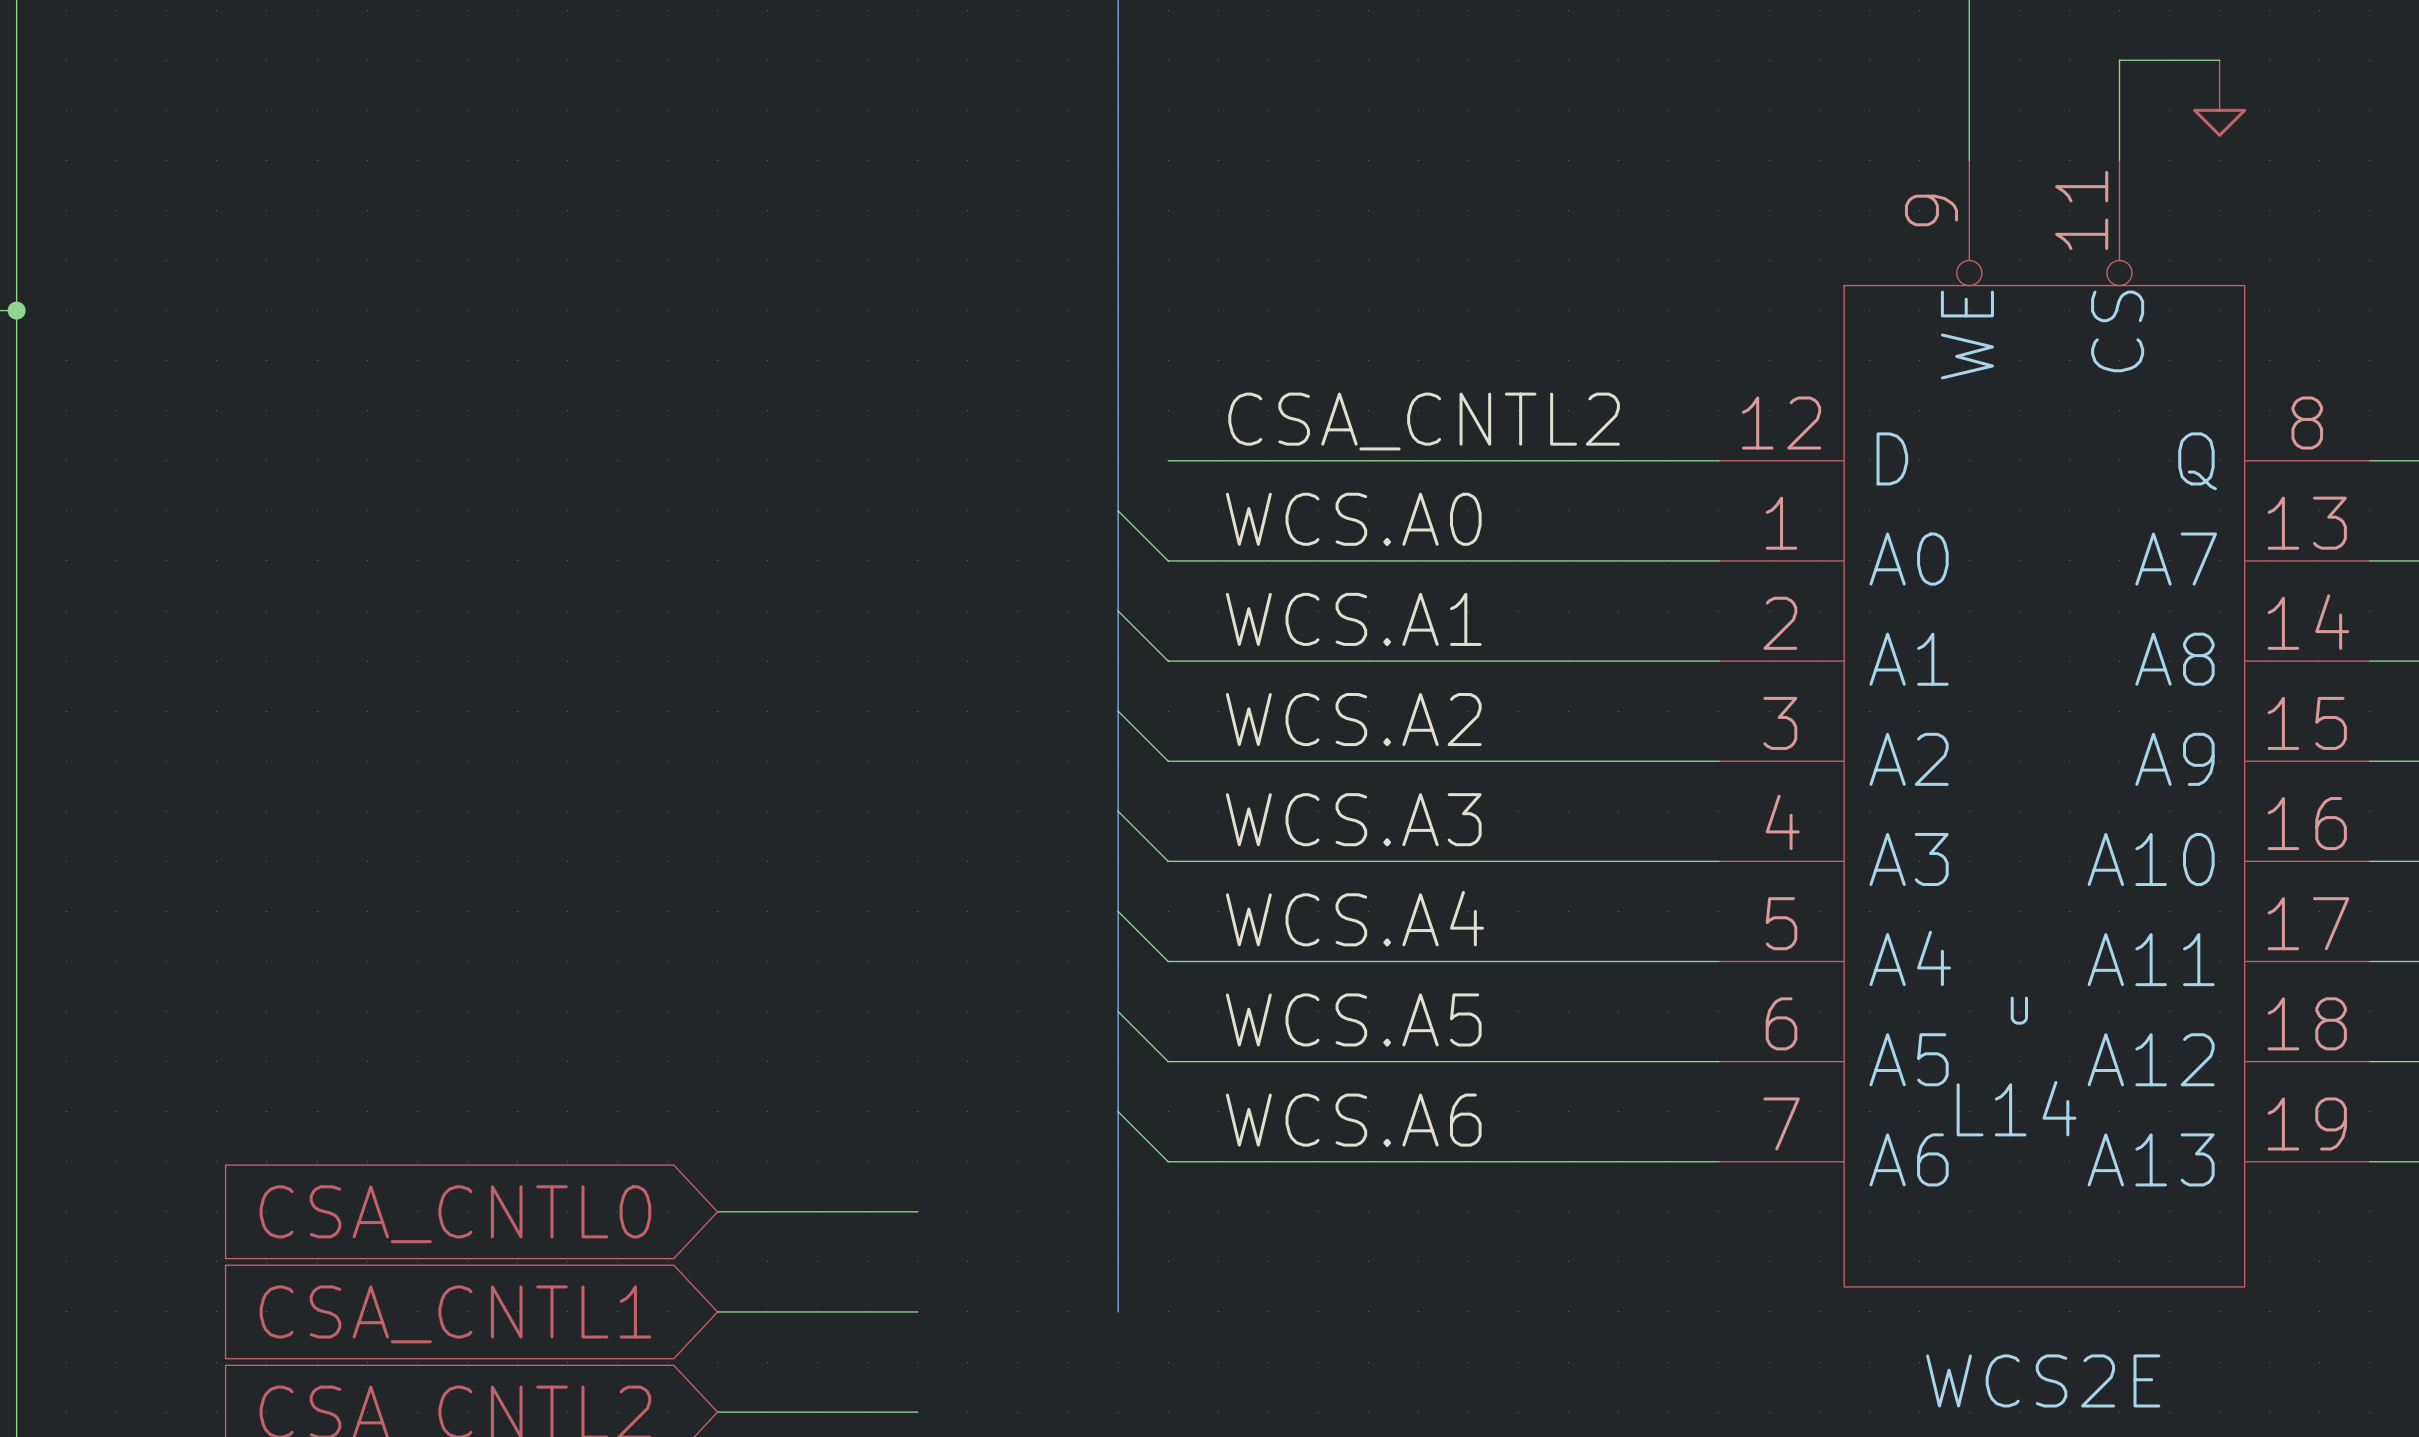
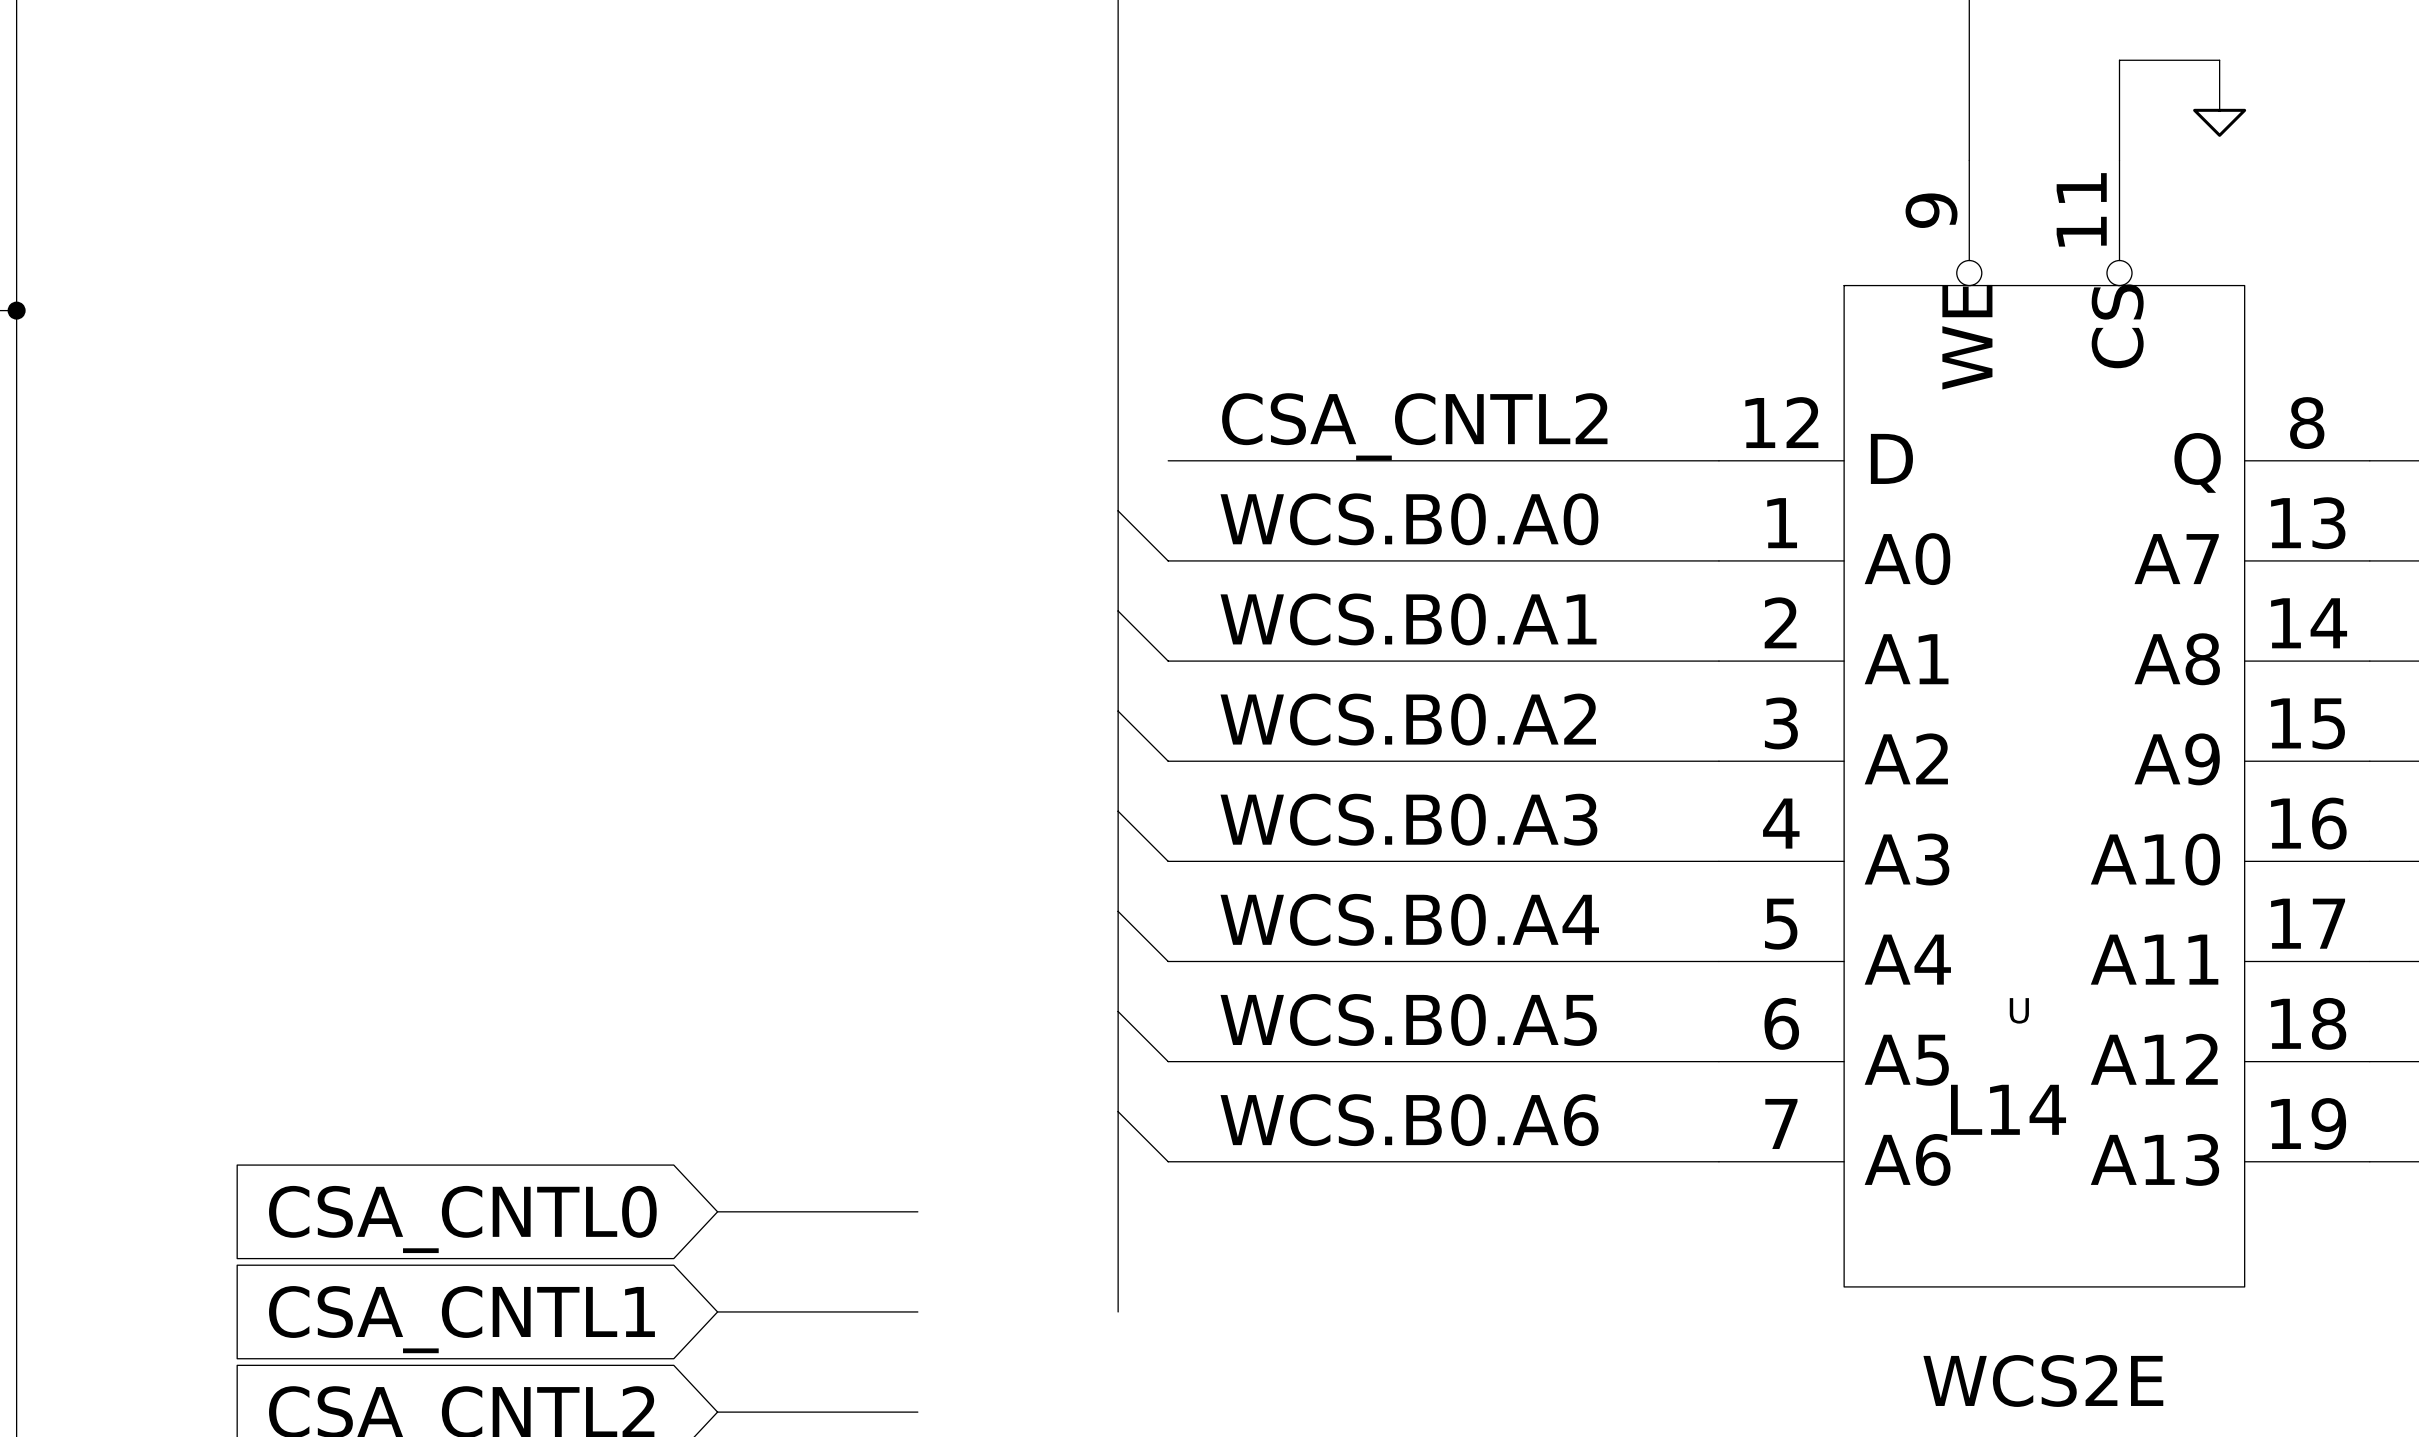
label: WCS.A0 (1353, 519) -> WCS.B0.A0 (1409, 519)
label: WCS.A1 (1353, 619) -> WCS.B0.A1 (1408, 619)
label: WCS.A2 (1353, 719) -> WCS.B0.A2 (1408, 719)
label: WCS.A3 (1353, 819) -> WCS.B0.A3 (1408, 819)
label: WCS.A4 (1354, 918) -> WCS.B0.A4 (1409, 919)
label: WCS.A5 (1353, 1019) -> WCS.B0.A5 (1408, 1019)
label: WCS.A6 (1353, 1120) -> WCS.B0.A6 (1409, 1120)

